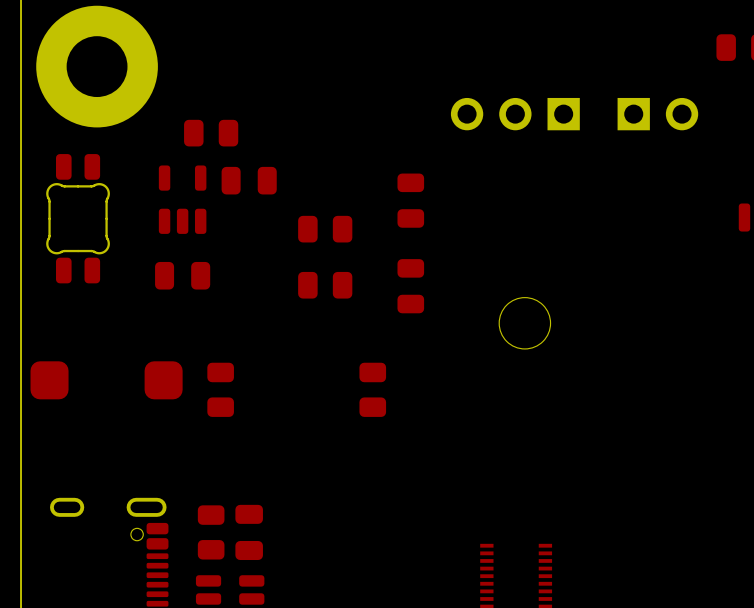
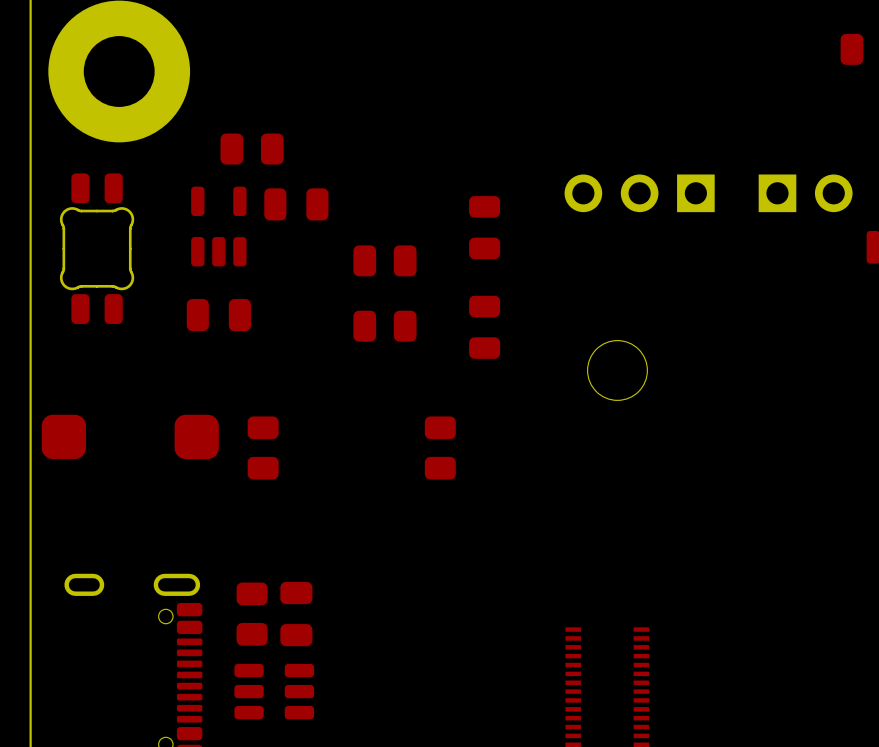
part position: (515, 114) -> (639, 193)
part position: (657, 114) -> (805, 193)

